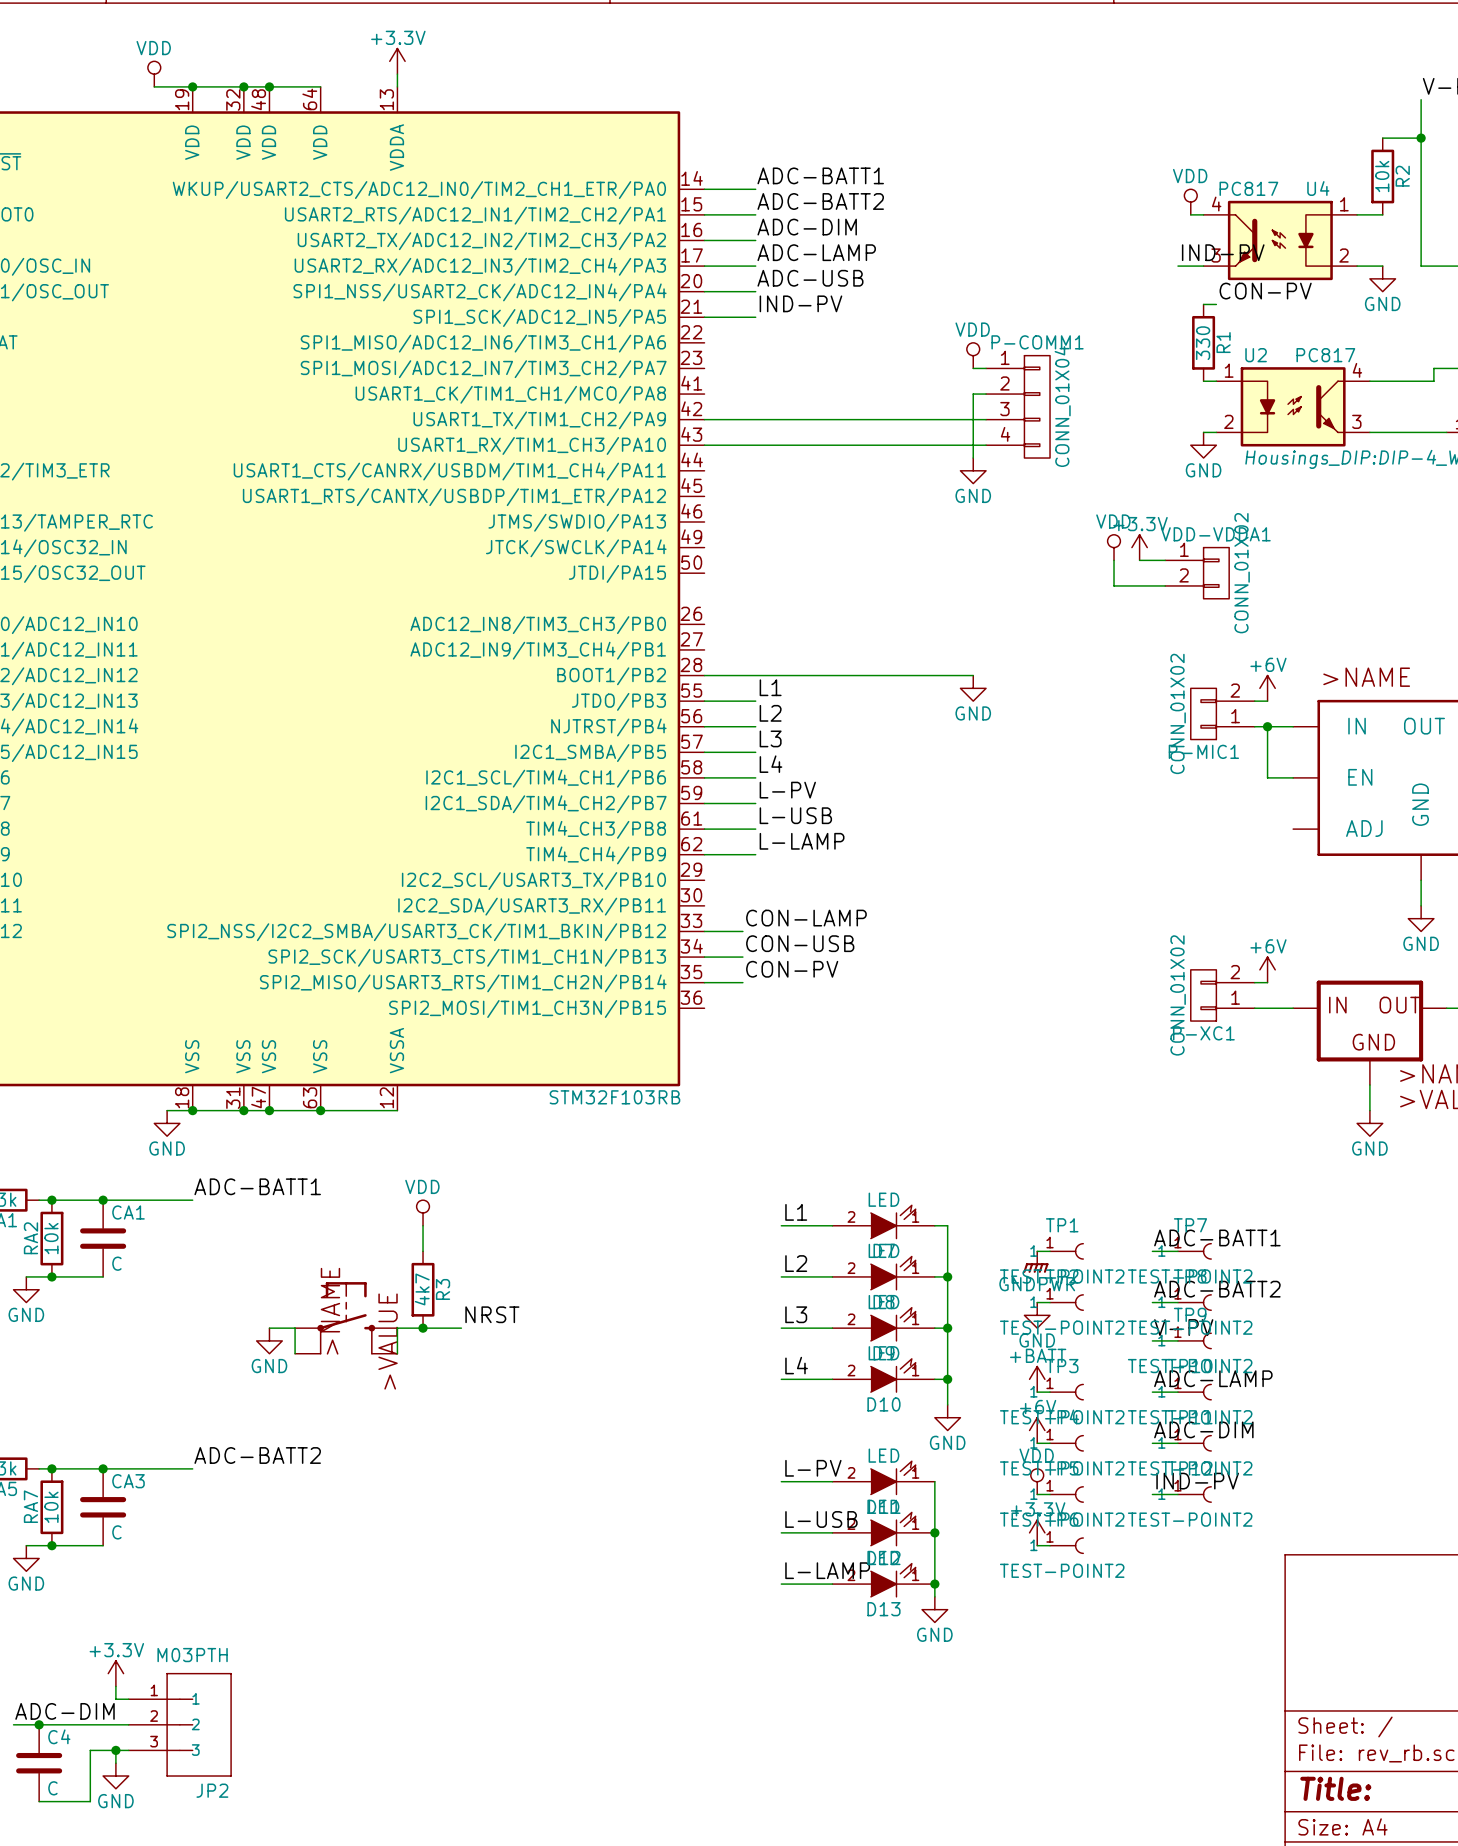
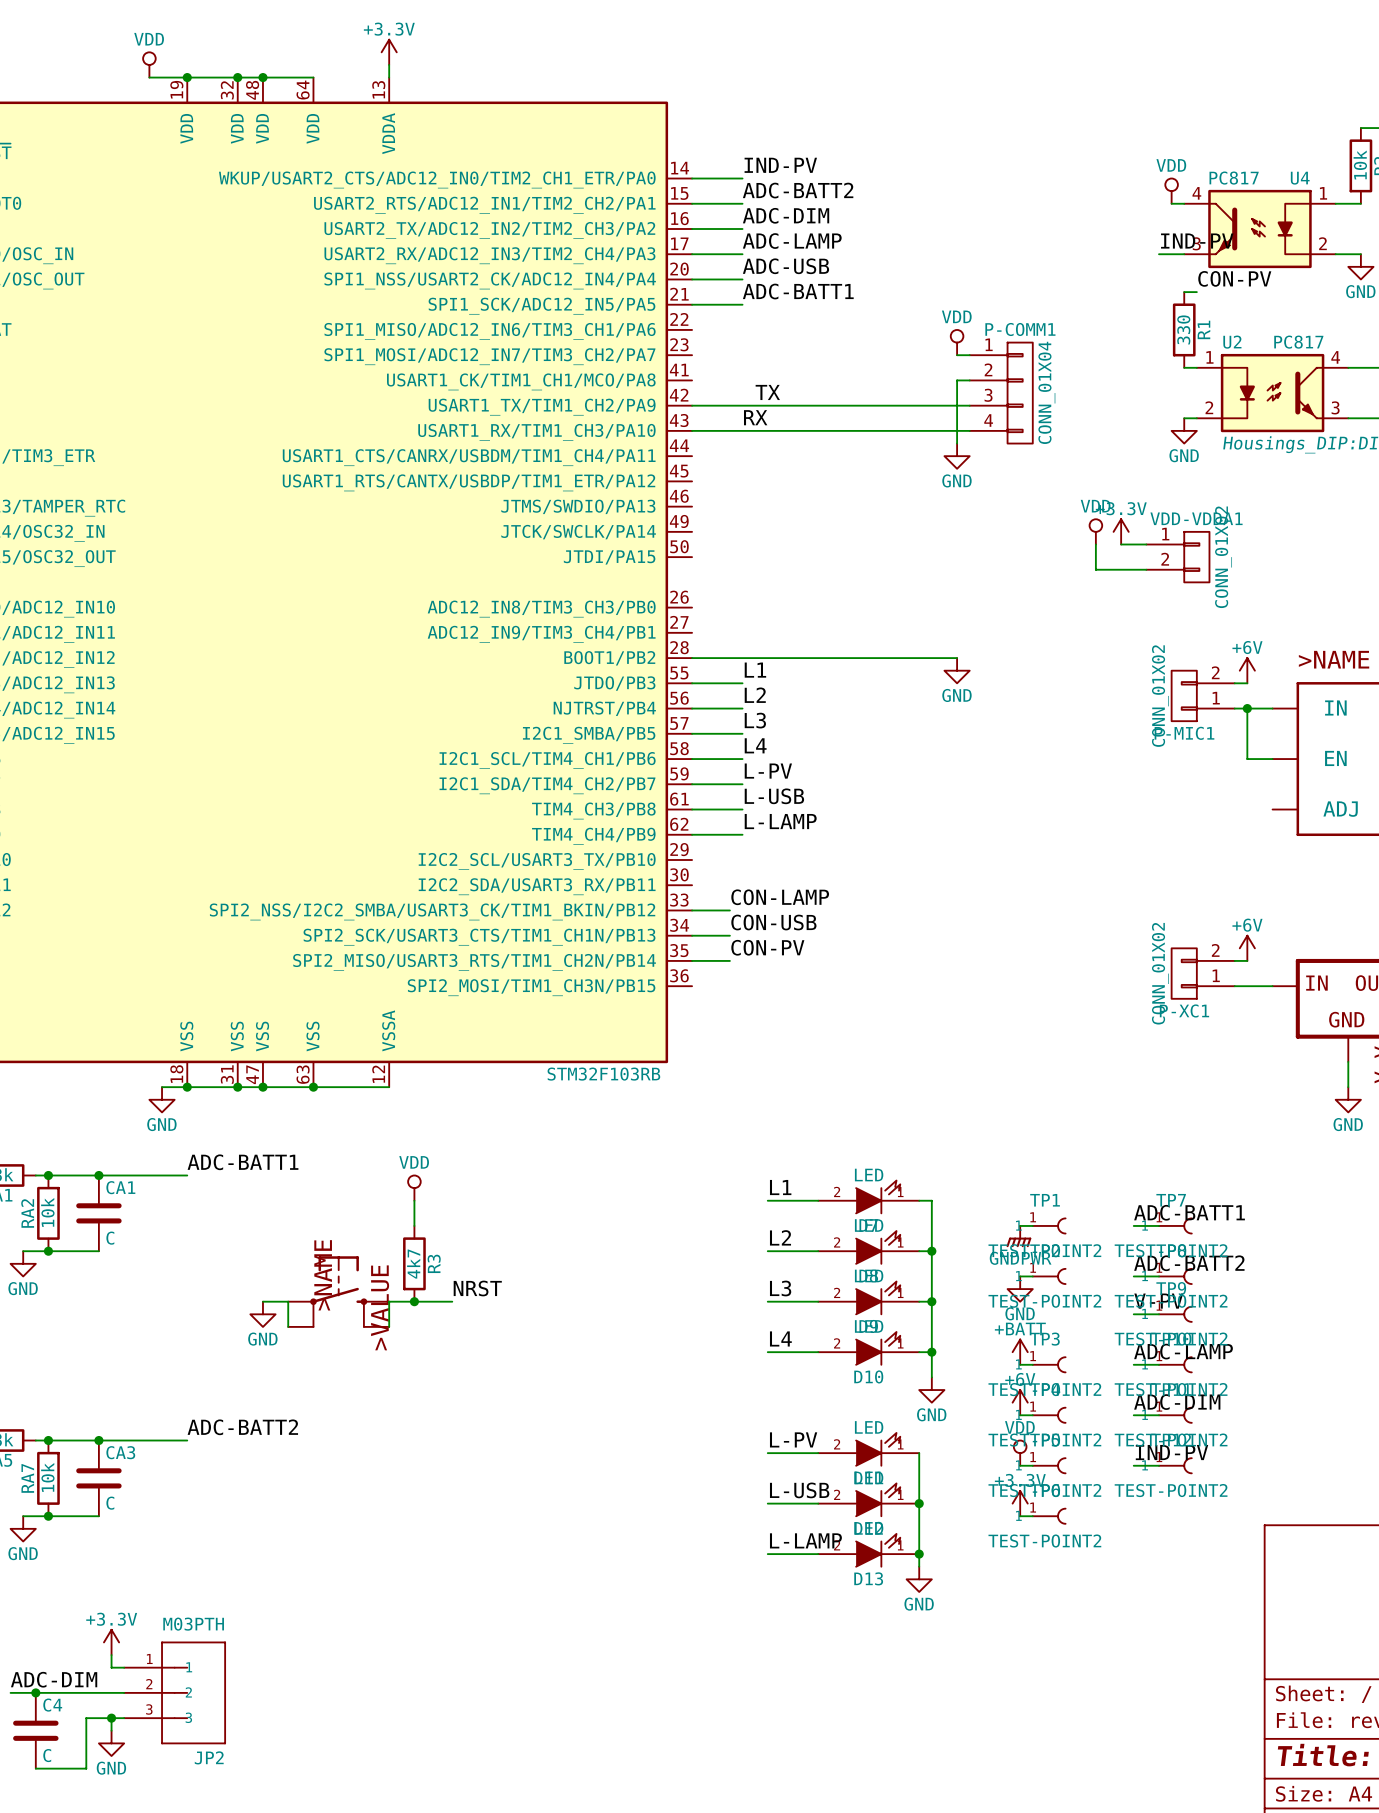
label: ADC-BATT1 (820, 175) -> IND-PV (780, 165)
label: IND-PV (800, 303) -> ADC-BATT1 (798, 291)
label: none -> TX (767, 392)
label: none -> RX (755, 417)

